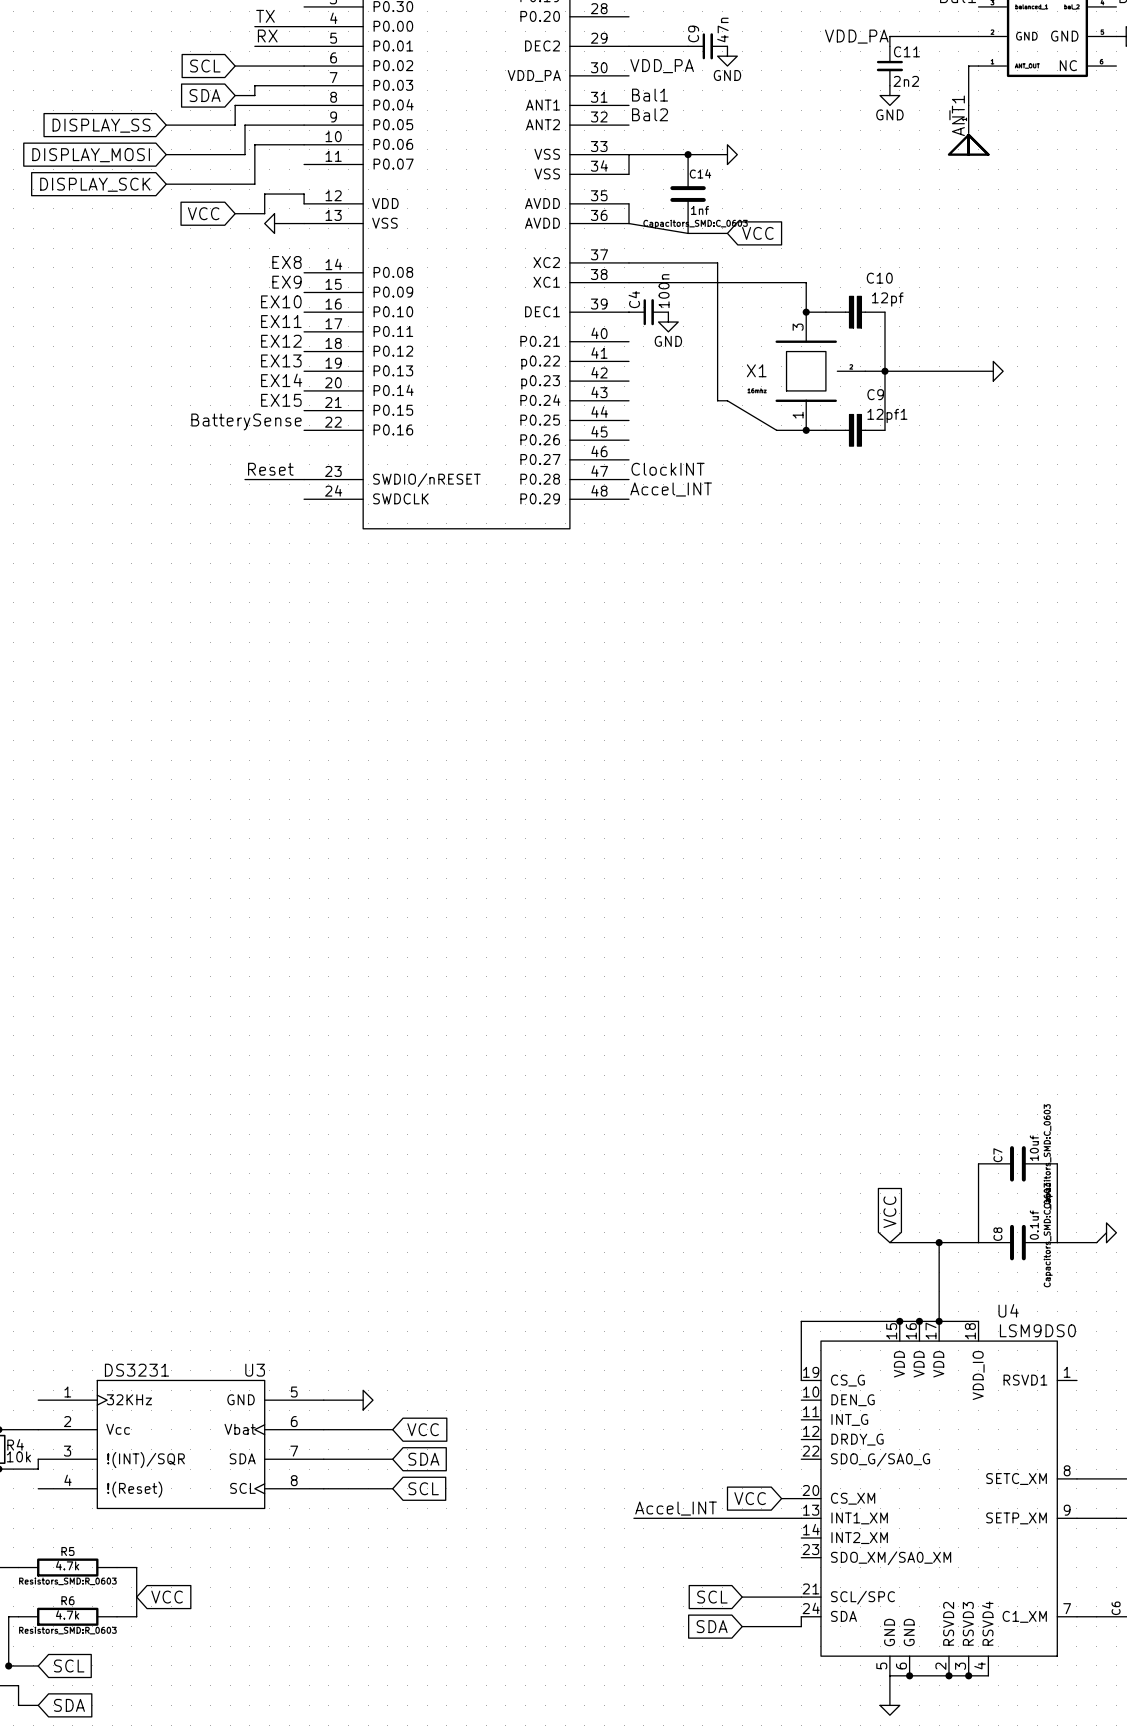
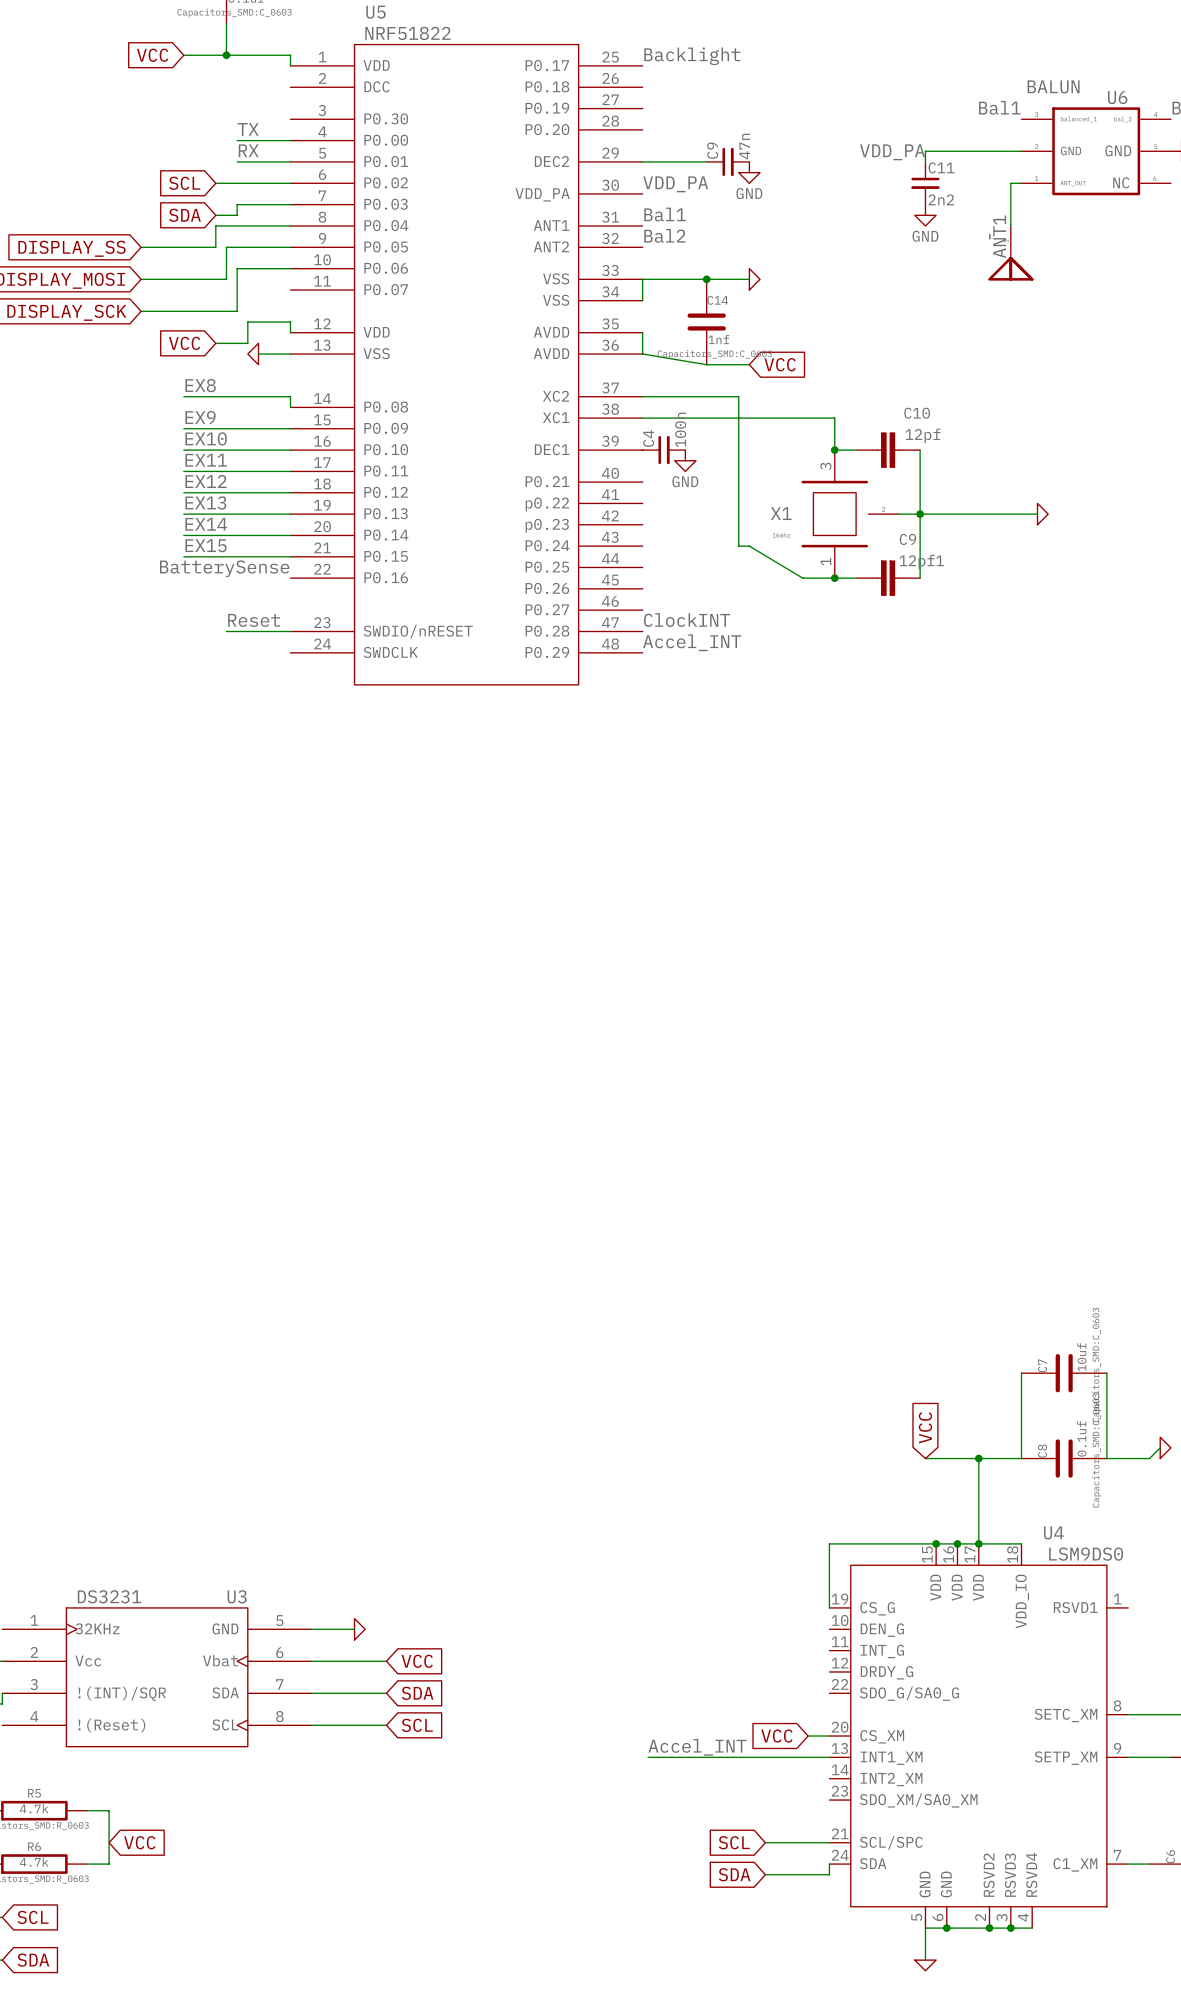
wire: none -> (183, 396) (290, 396) (290, 407)
label position: EX8 (286, 262) -> EX8 (200, 385)
label position: EX9 (286, 282) -> EX9 (200, 417)
wire: none -> (183, 428) (290, 428)
label position: EX10 (281, 301) -> EX10 (206, 438)
wire: none -> (183, 450) (290, 450)
label position: EX11 (281, 321) -> EX11 (206, 460)
wire: none -> (183, 471) (290, 471)
label position: EX12 (281, 341) -> EX12 (206, 481)
wire: none -> (183, 492) (290, 492)
label position: EX13 (281, 360) -> EX13 (205, 502)
wire: none -> (183, 514) (290, 514)
label position: EX14 (281, 380) -> EX14 (206, 524)
wire: none -> (183, 535) (290, 535)
label position: EX15 (281, 400) -> EX15 (206, 545)
wire: none -> (183, 556) (290, 556)

